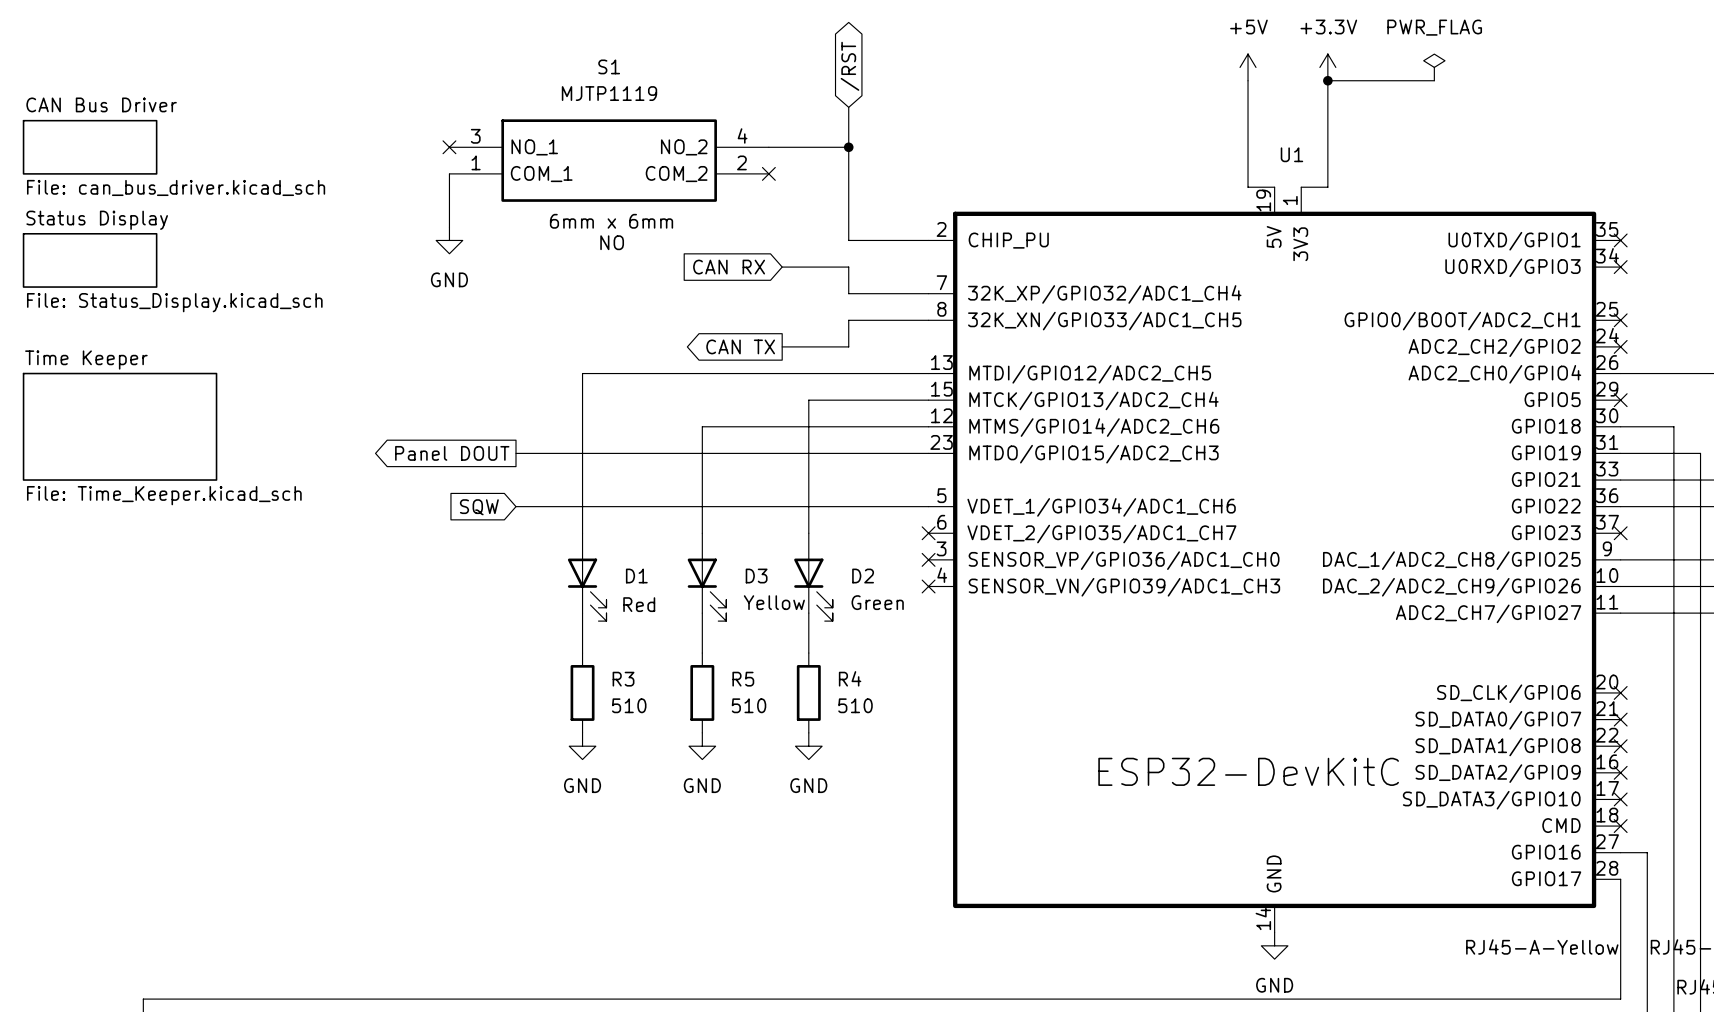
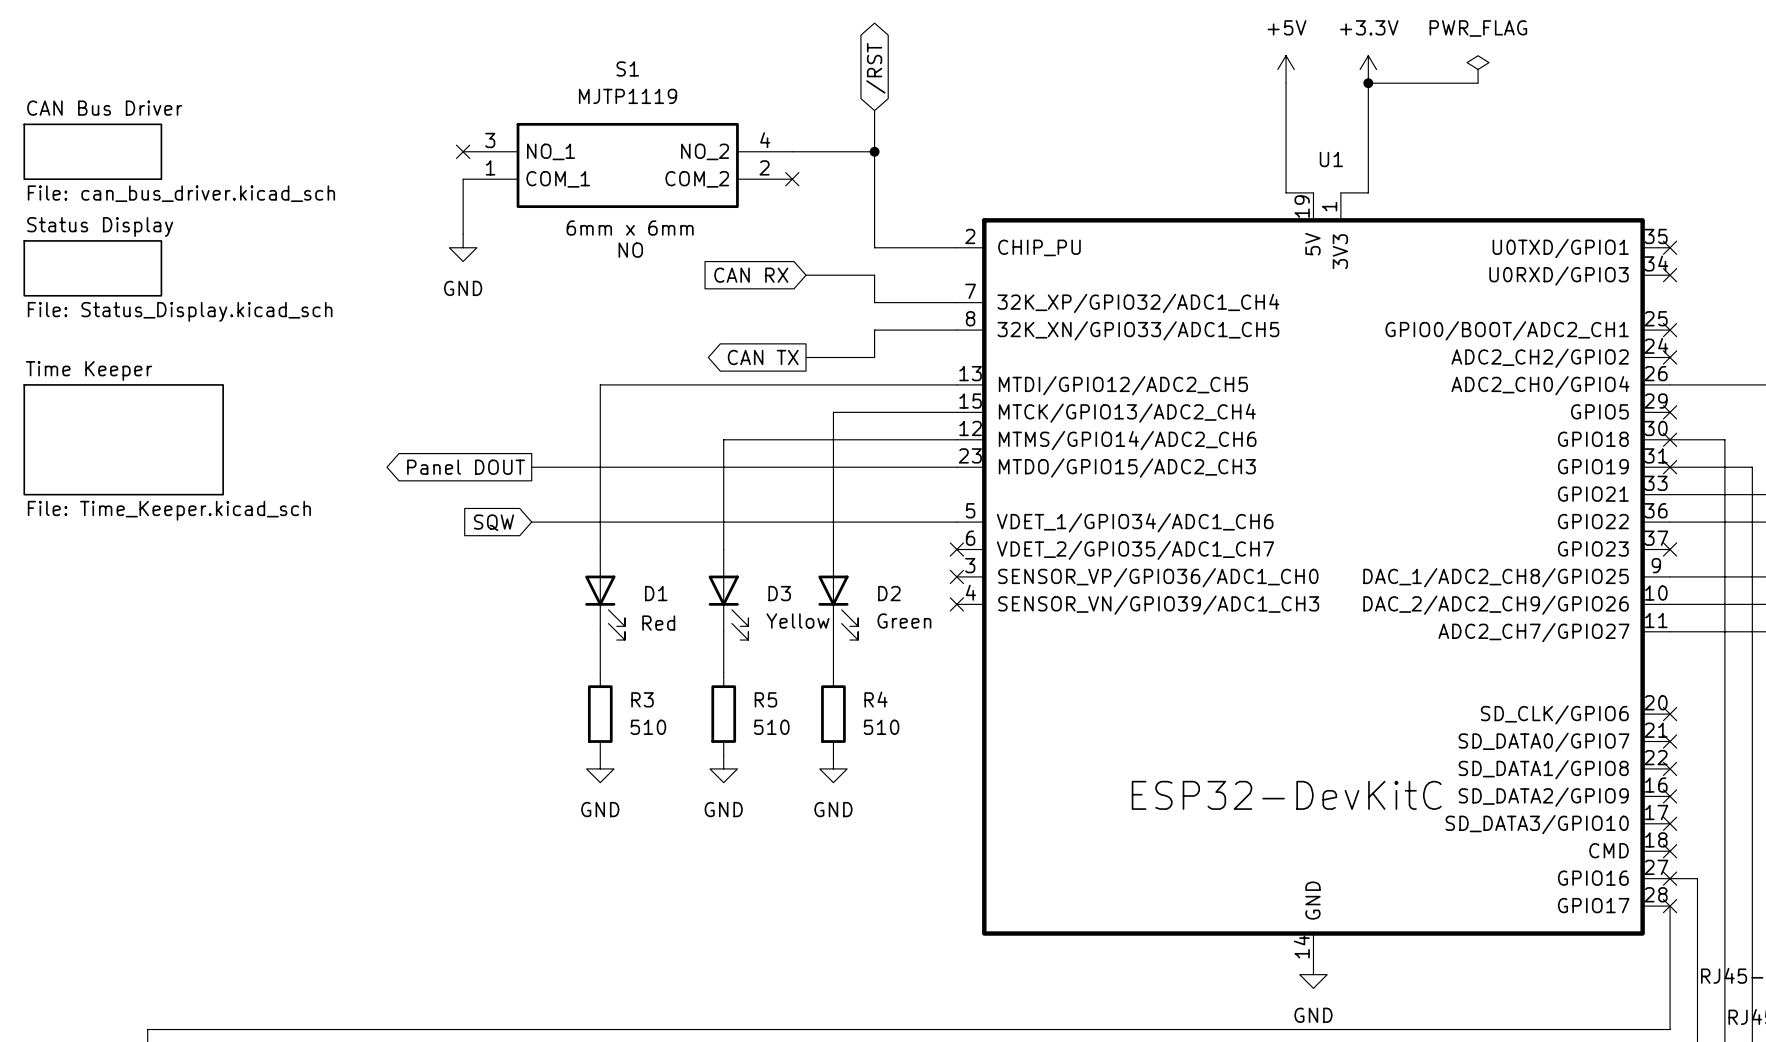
no-connect mark: none -> (1670, 439)
no-connect mark: none -> (1670, 467)
no-connect mark: none -> (1670, 878)
no-connect mark: none -> (1670, 906)
label: RJ45-A-Yellow (1542, 946) -> none

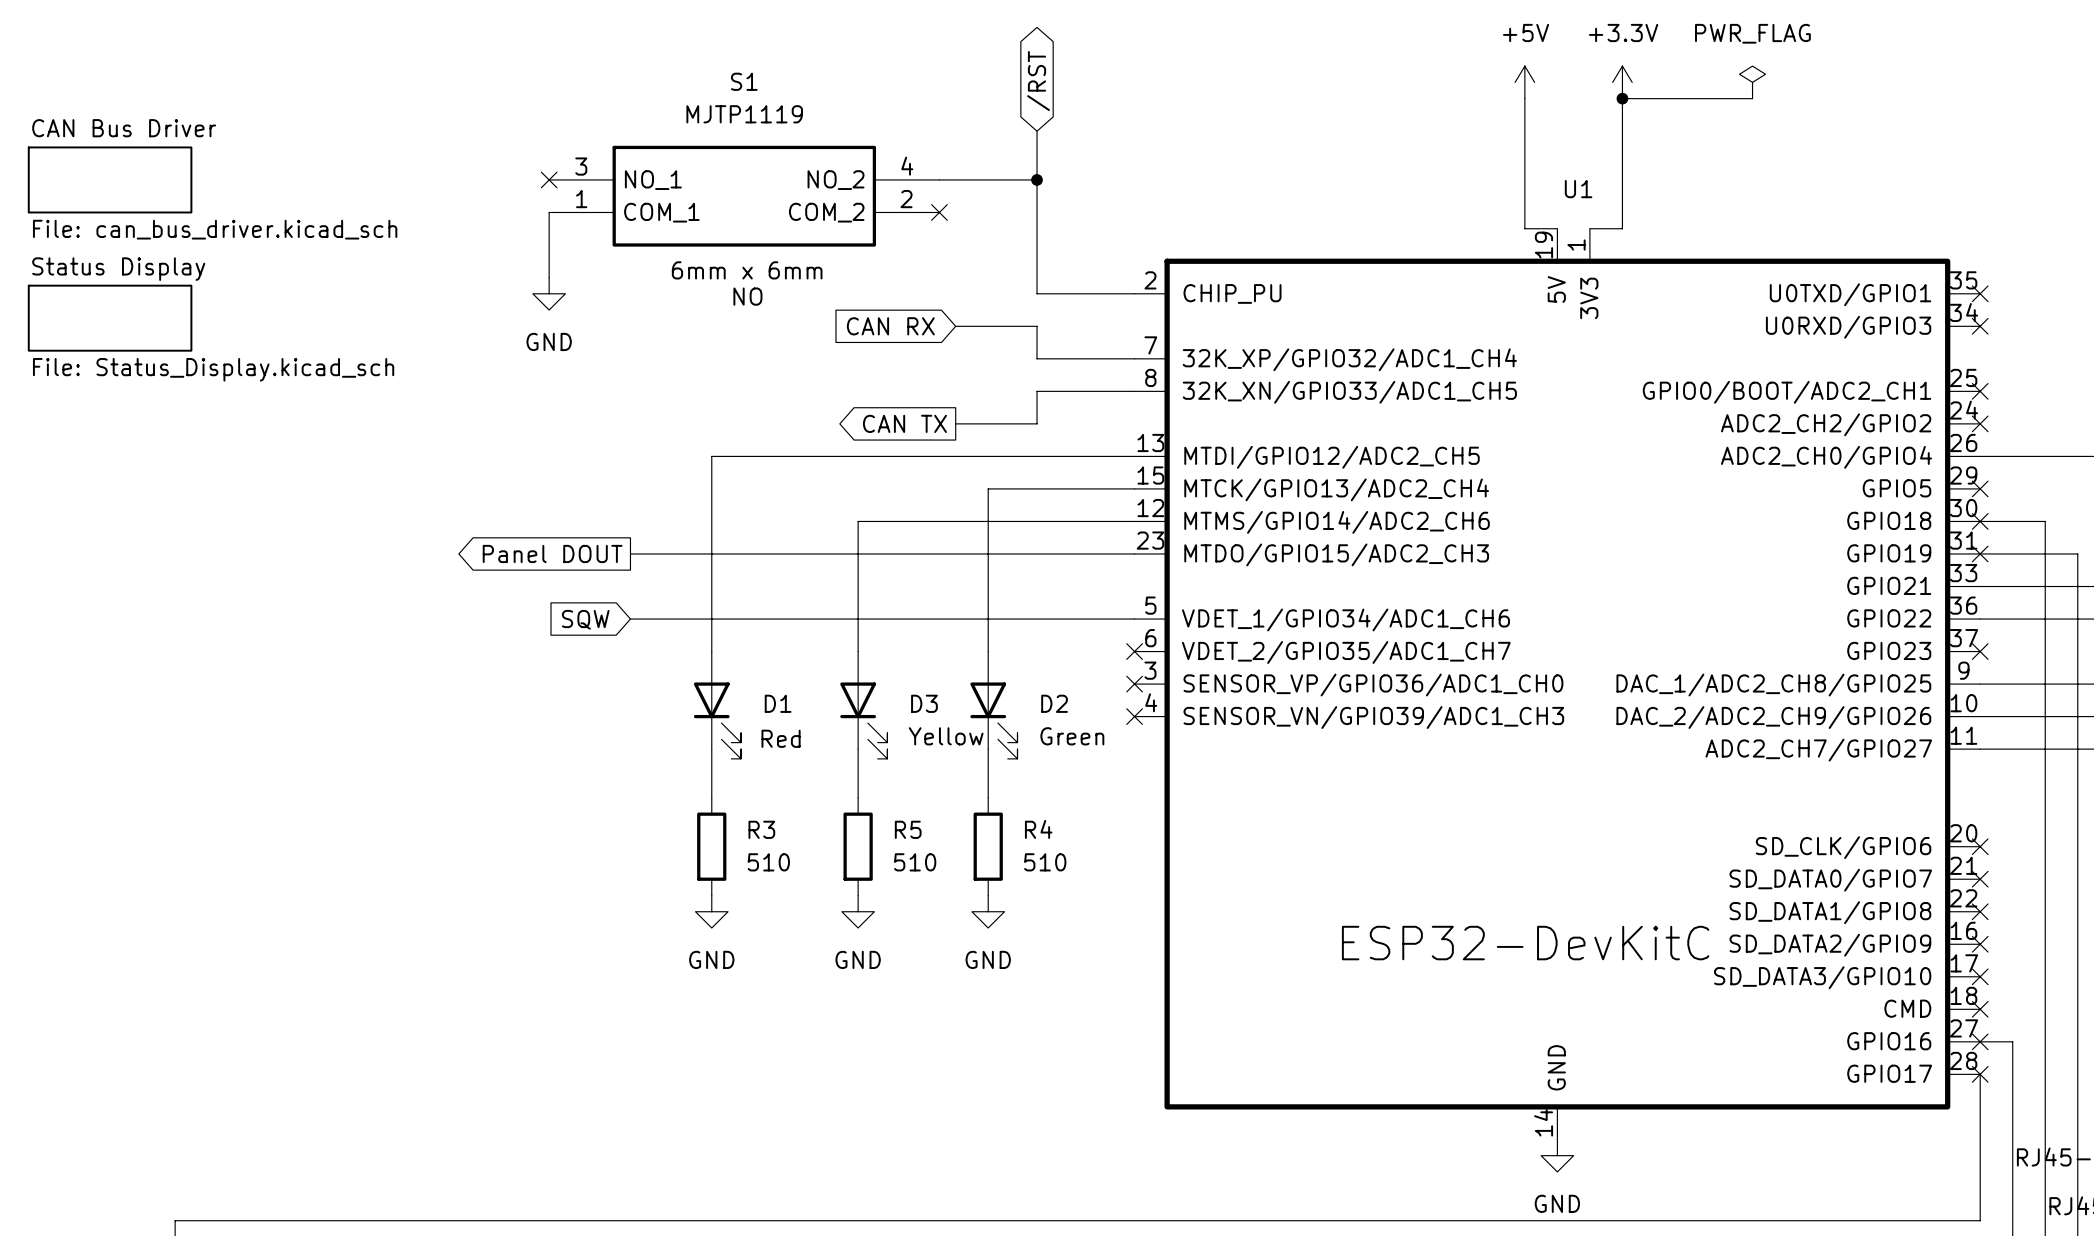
sheet Time Keeper: File: Time_Keeper.kicad_sch (123, 439) -> none

